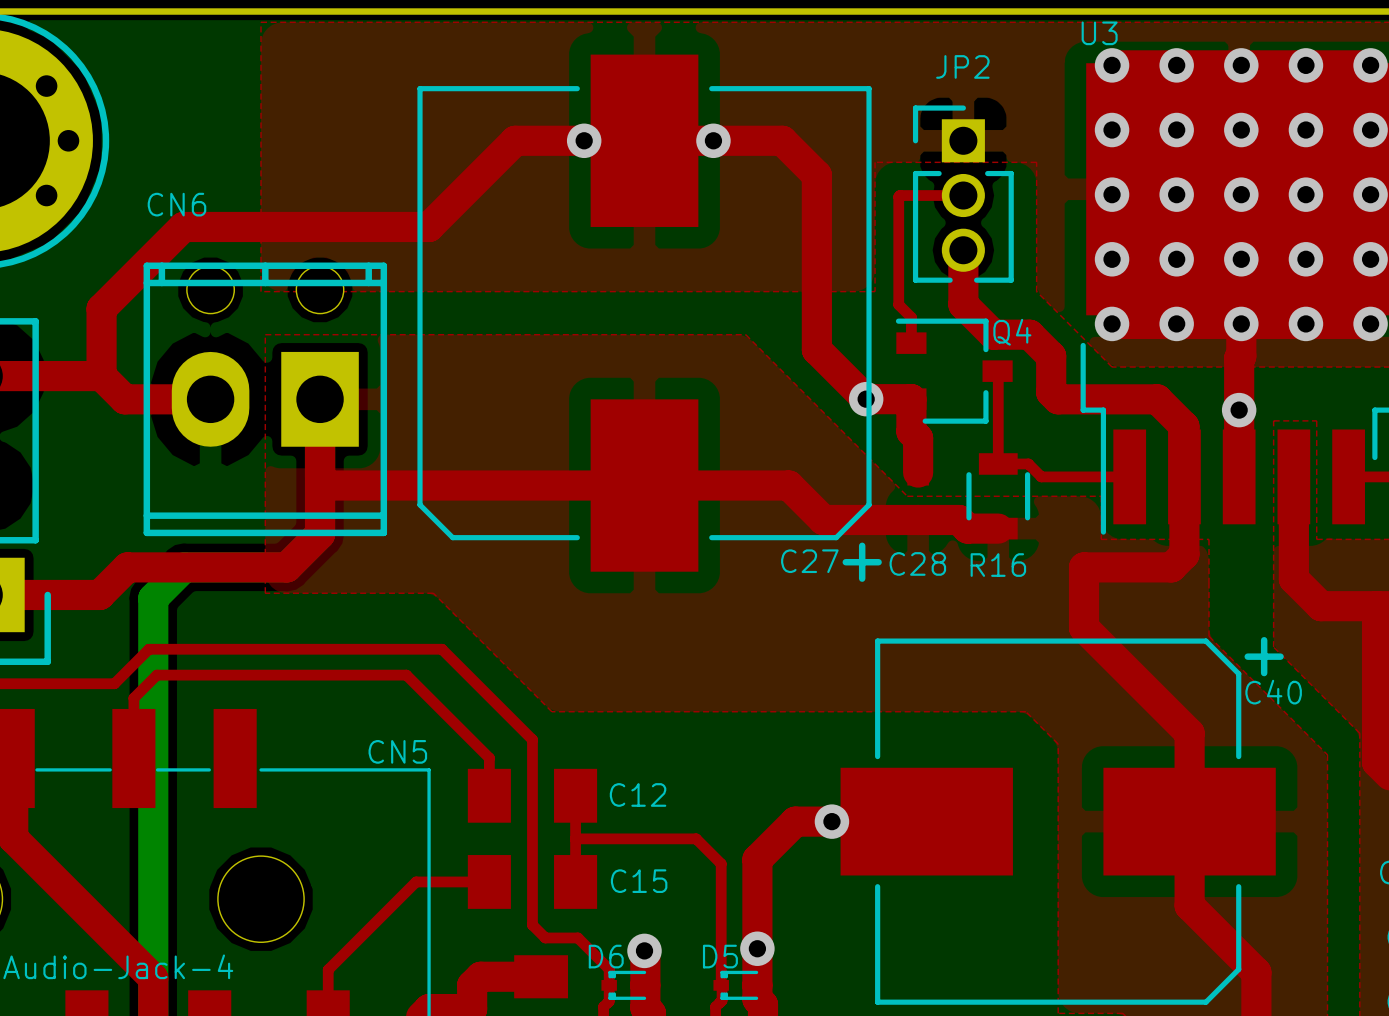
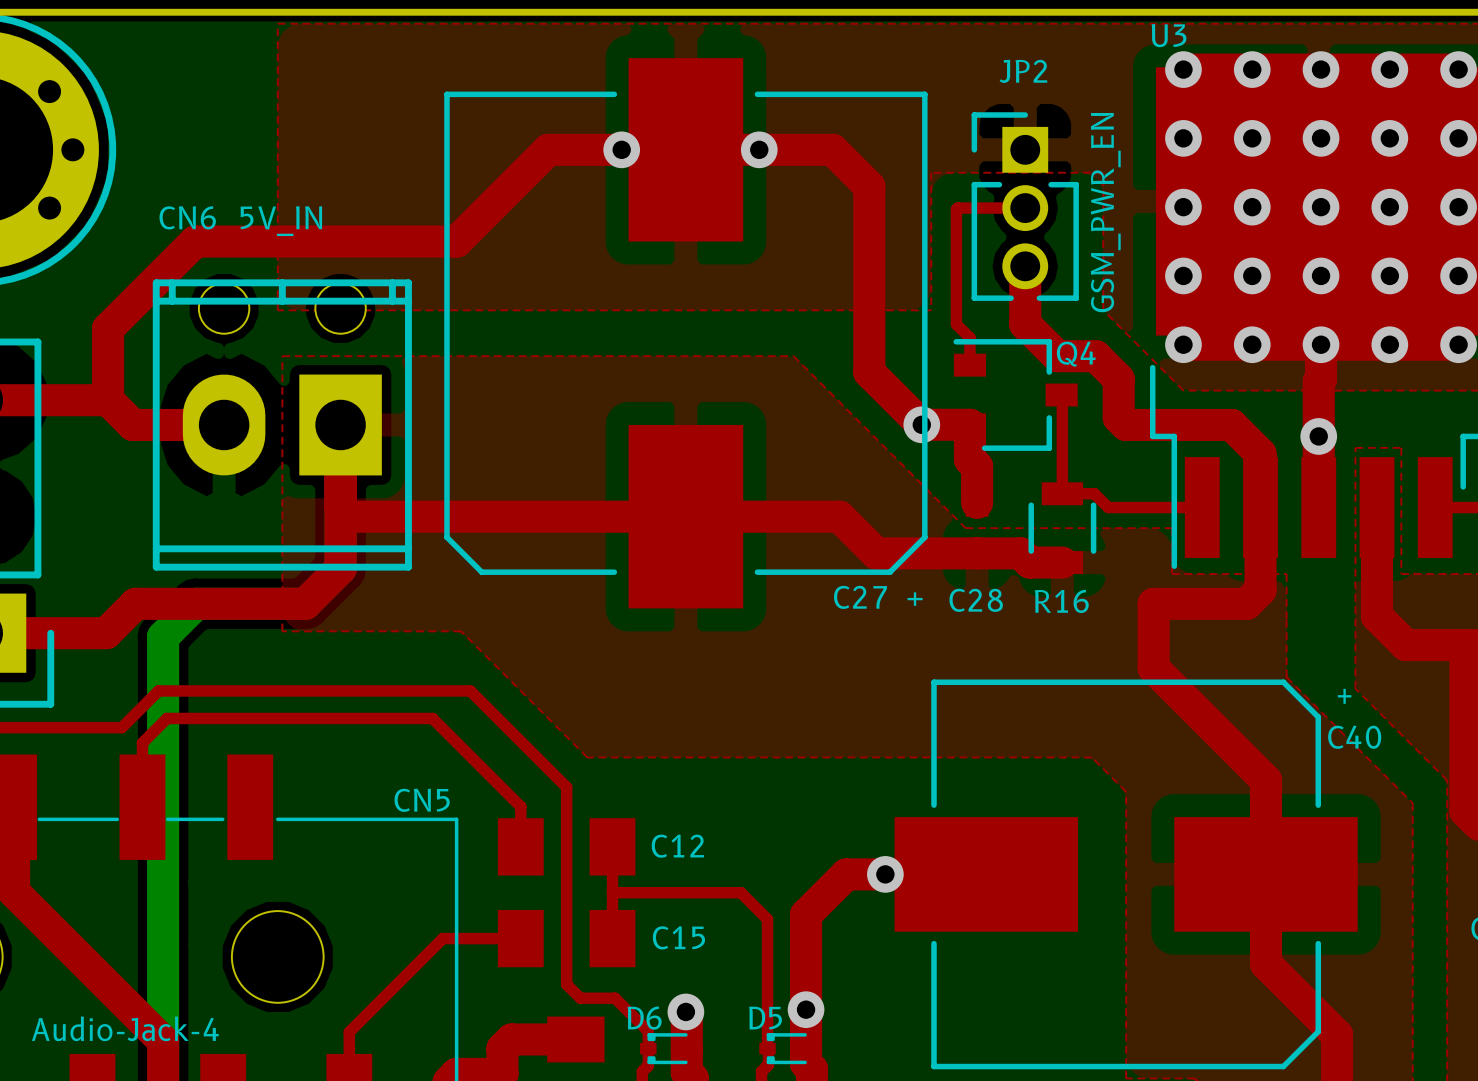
C27 footprint: [417, 54, 872, 572] -> [444, 58, 928, 609]
JP2 value: none -> GSM_PWR_EN (1105, 212)
CN6 value: none -> 5V_IN (281, 221)
C40 footprint: [840, 638, 1276, 1005] -> [894, 679, 1358, 1070]

